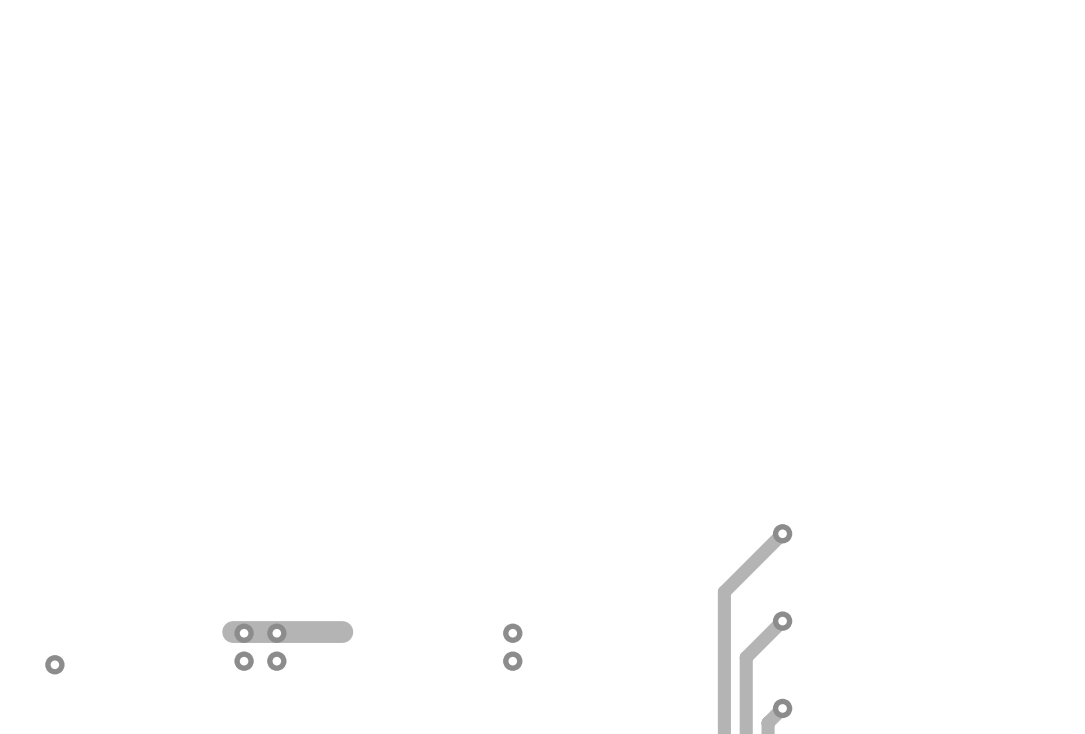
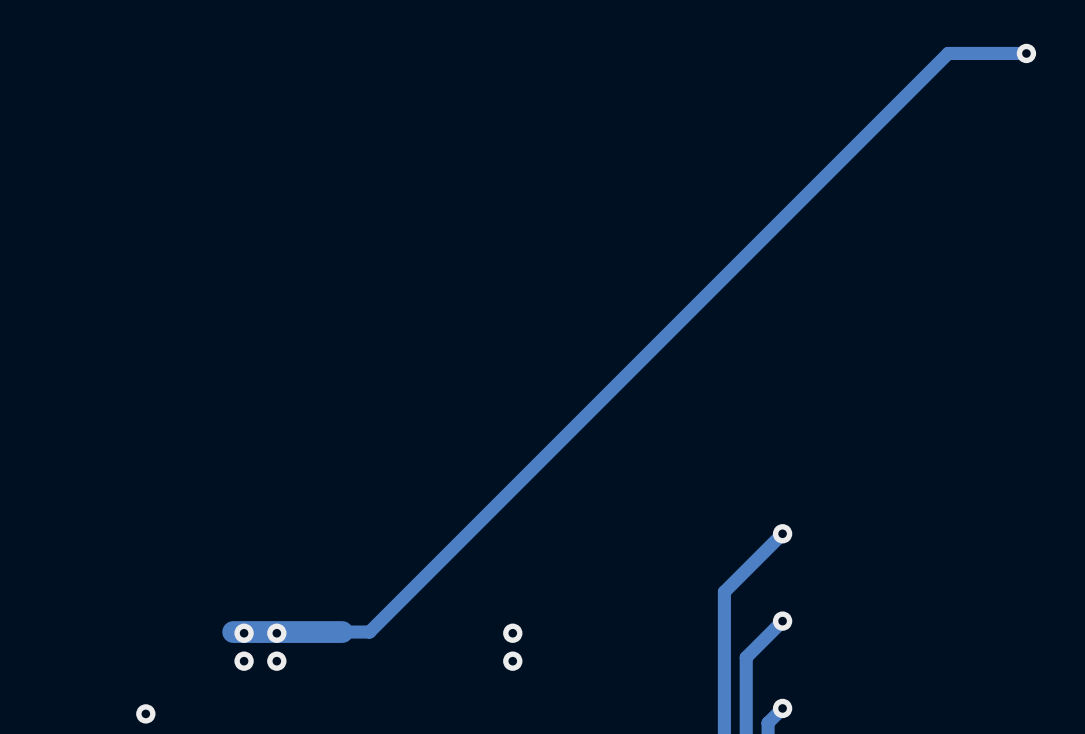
track: none -> (1026, 53) (948, 53) (369, 632) (342, 632)
via: none -> (1026, 53)
via position: (54, 664) -> (145, 713)

